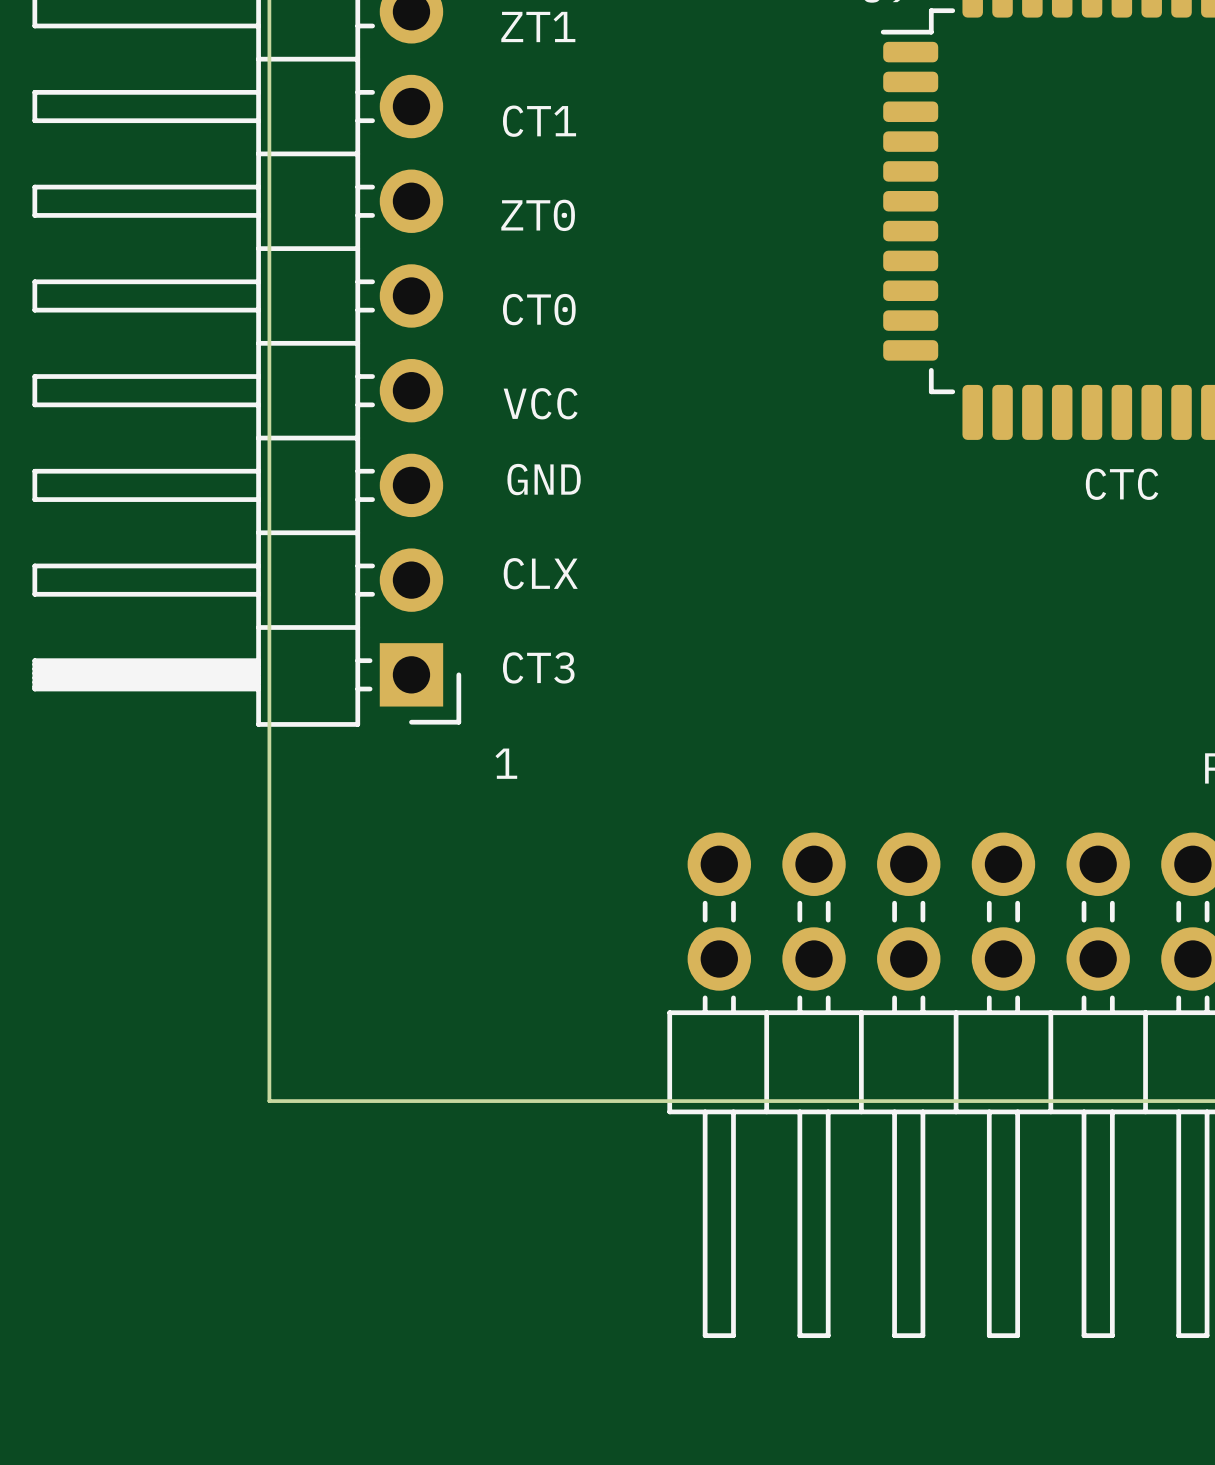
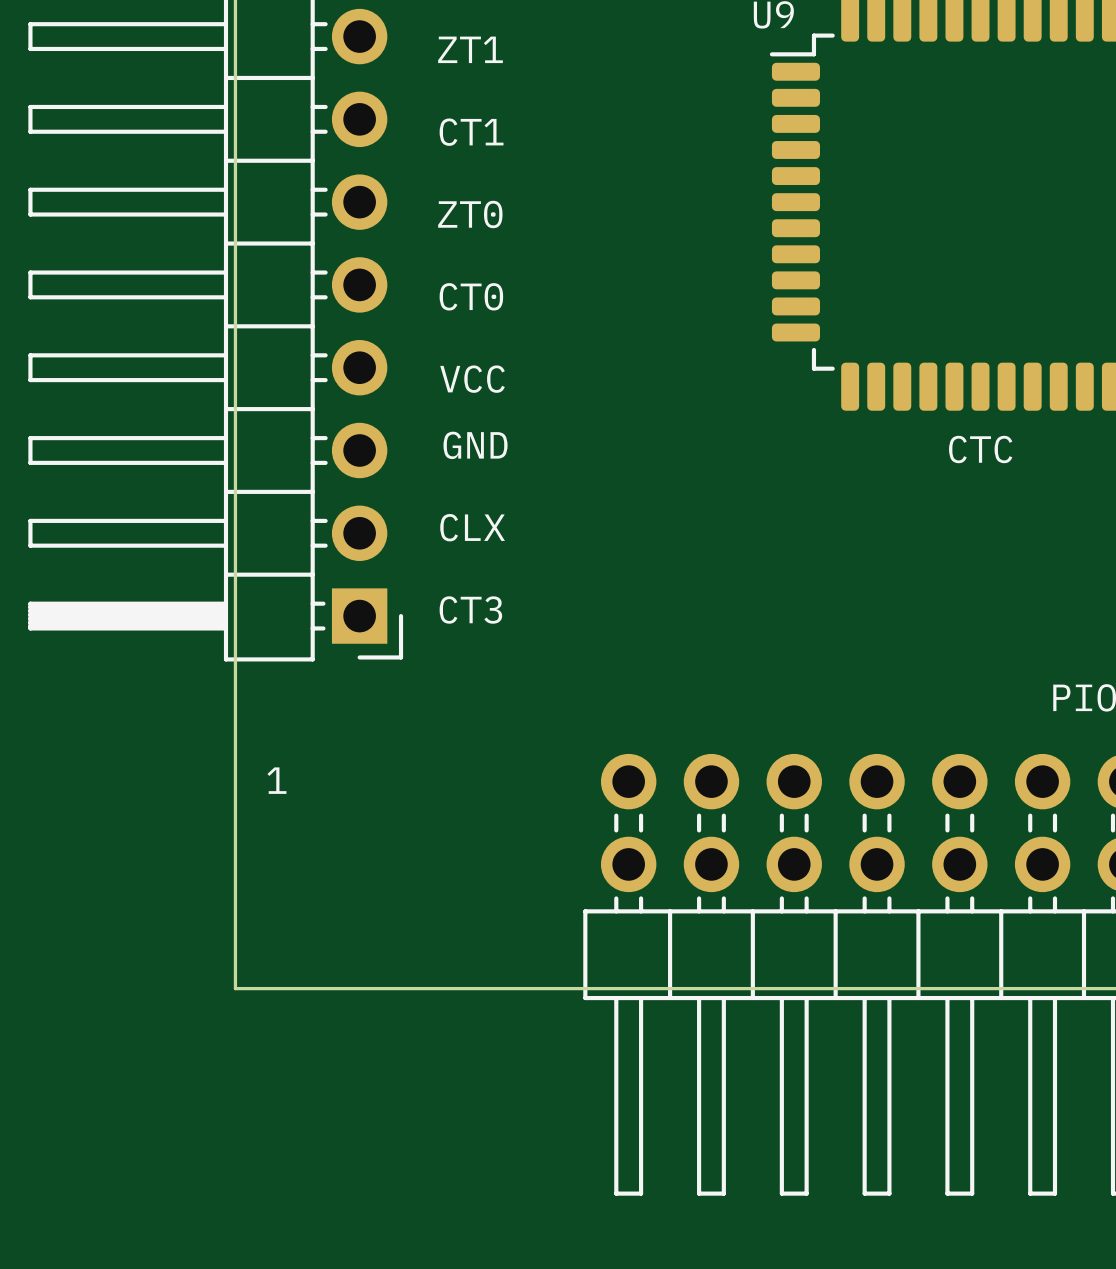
text position: 1 (506, 763) -> 1 (276, 780)

